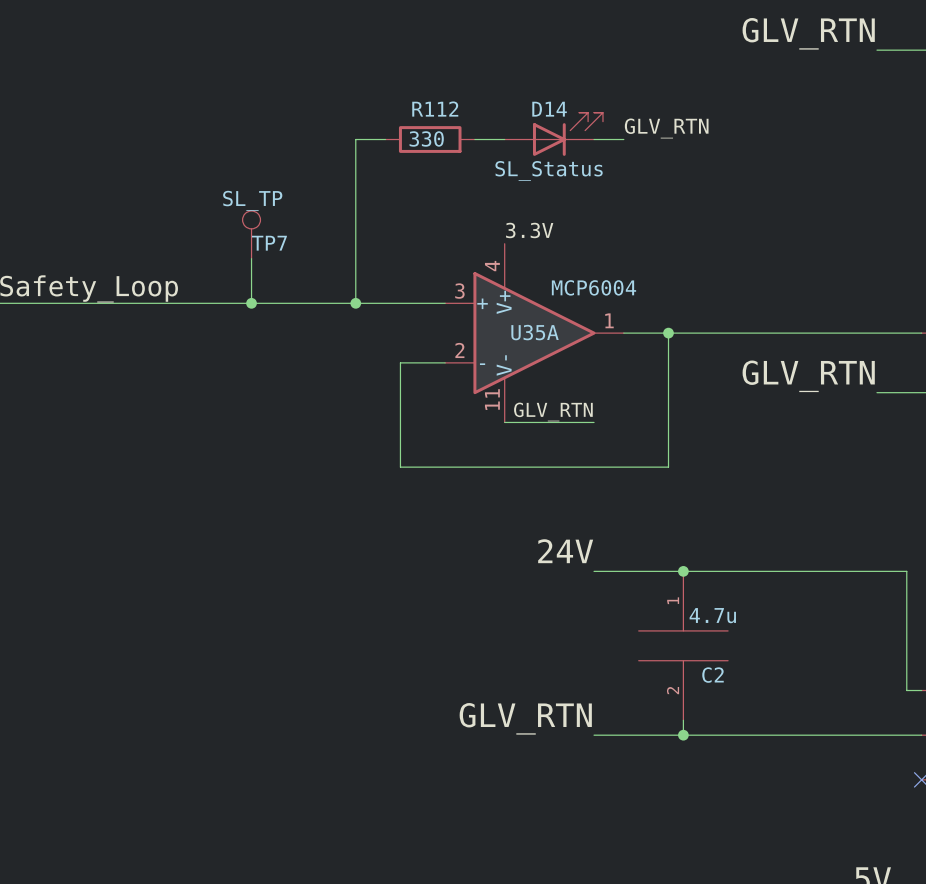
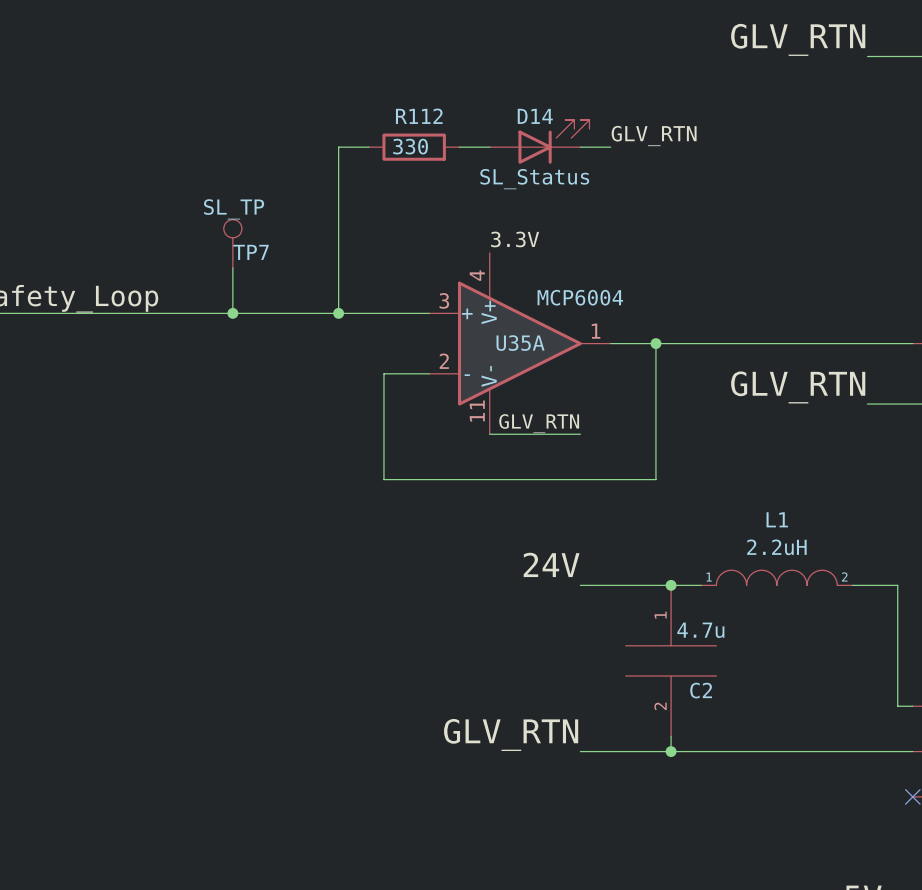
L1: none -> 2.2uH (776, 577)
wire: (713, 571) (862, 571) -> none

